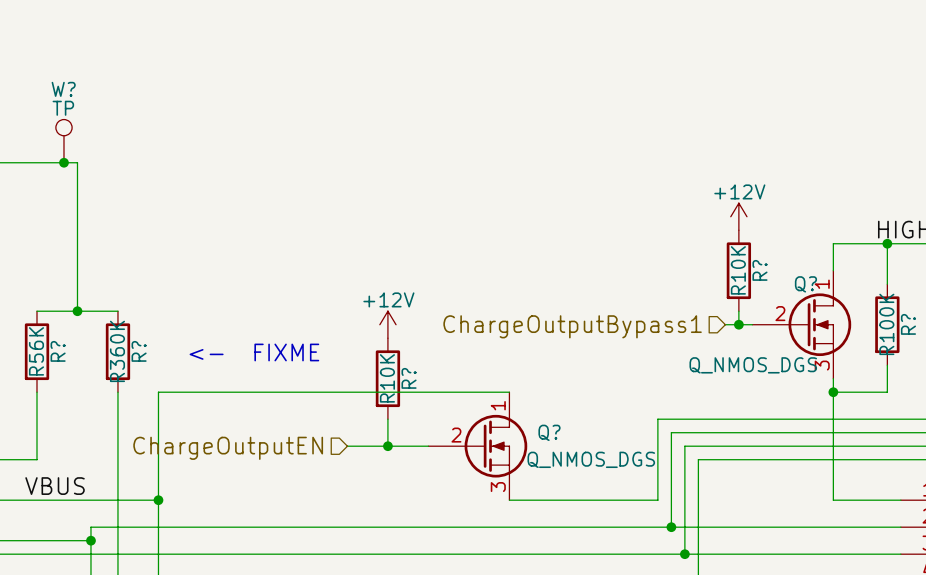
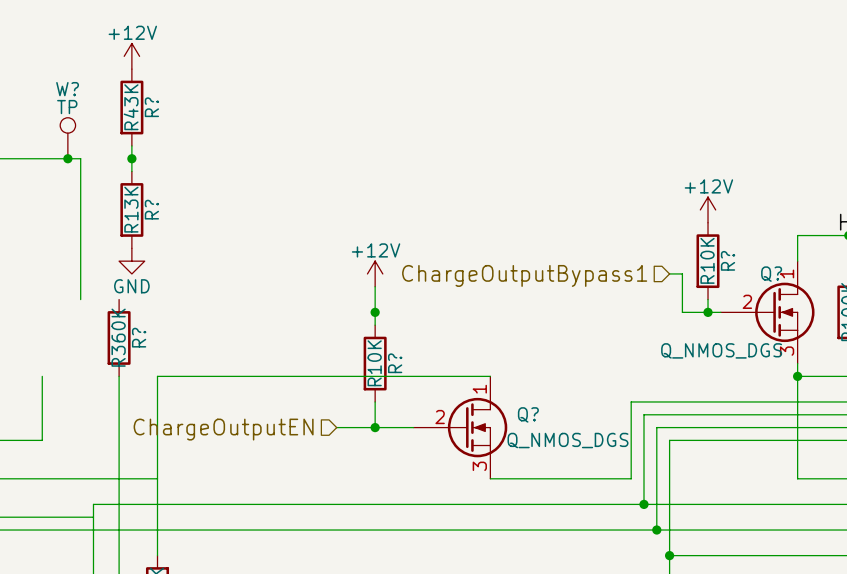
power symbol: none -> +12V (131, 56)
R?: none -> R43K (131, 107)
wire: none -> (131, 145) (131, 171)
junction: none -> (131, 158)
R?: none -> R13K (131, 209)
power symbol: none -> GND (131, 261)
wire: none -> (669, 273) (682, 273) (682, 312) (695, 312)
wire: (36, 311) (117, 311) -> none
junction: (77, 311) -> none
power symbol position: +12V (387, 324) -> +12V (375, 273)
junction: none -> (375, 312)
hierarchical label position: ChargeOutputBypass1 (572, 326) -> ChargeOutputBypass1 (524, 275)
R?: R56K (36, 351) -> none
text: <- FIXME (254, 352) -> none
label: VBUS (55, 486) -> none
junction: (158, 500) -> none
junction: (90, 540) -> none

